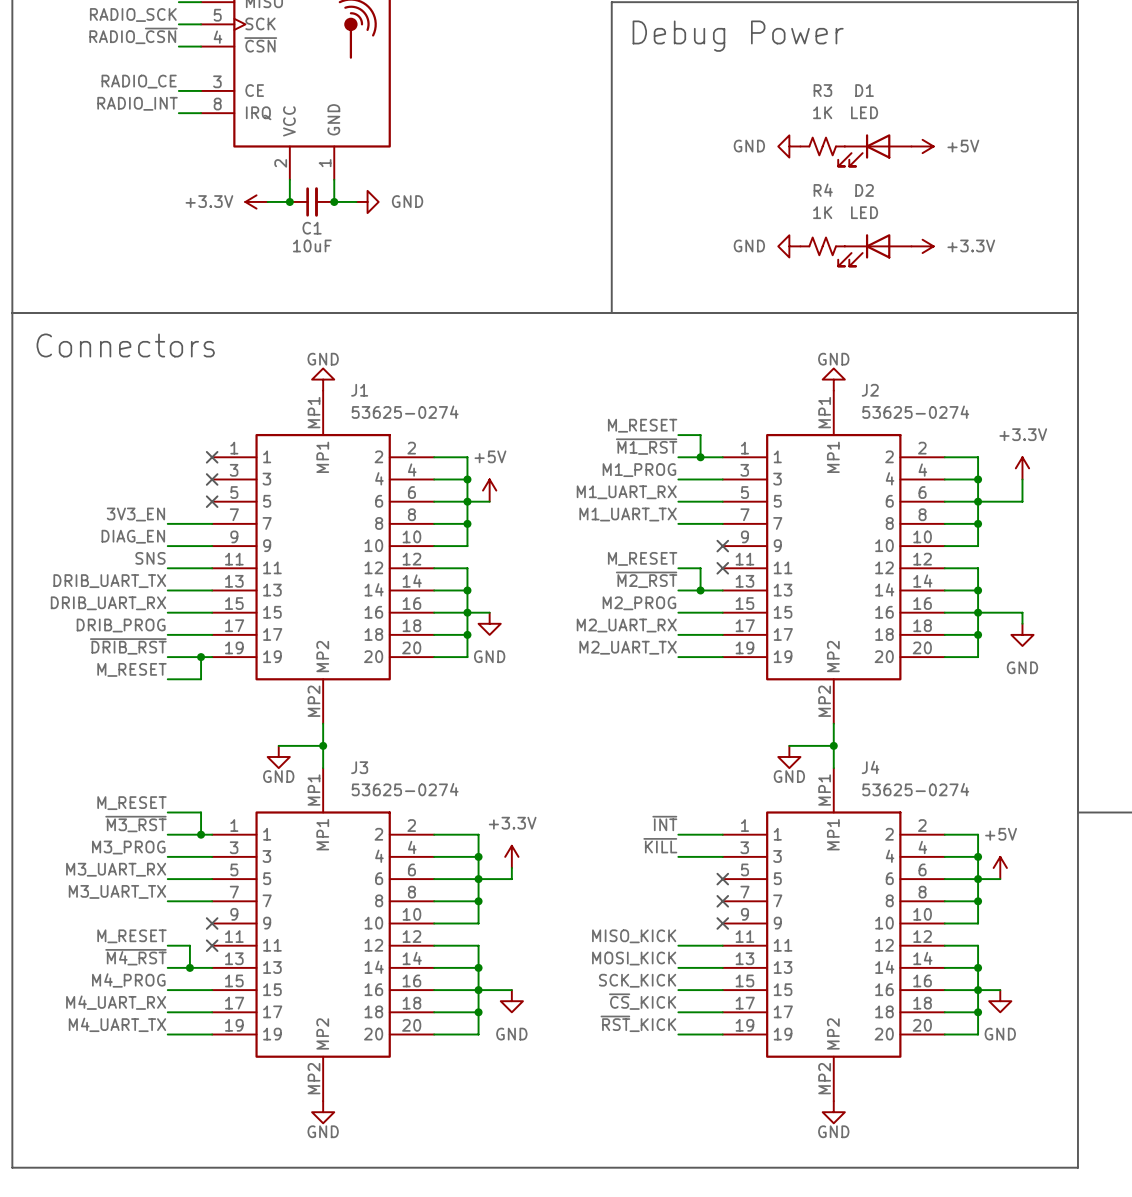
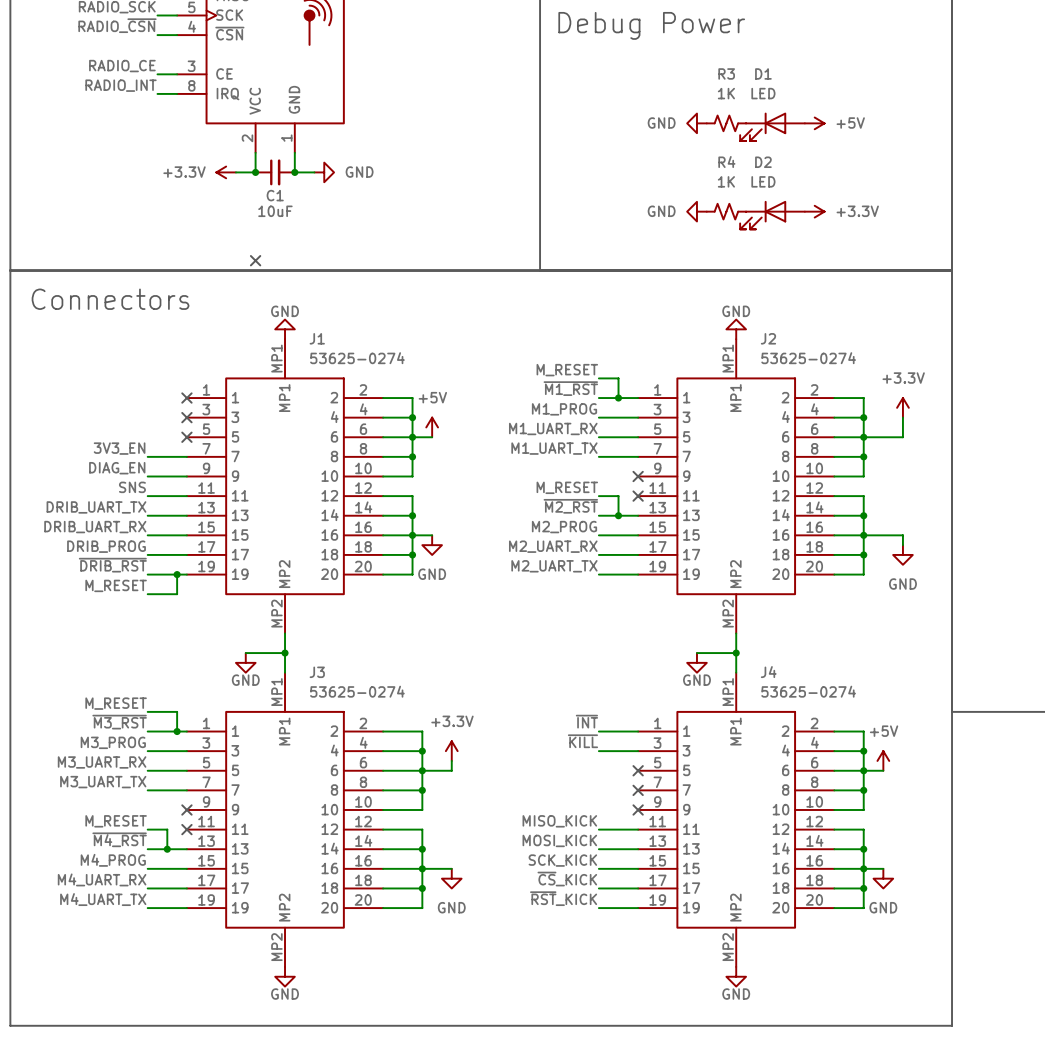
no-connect mark: none -> (255, 260)

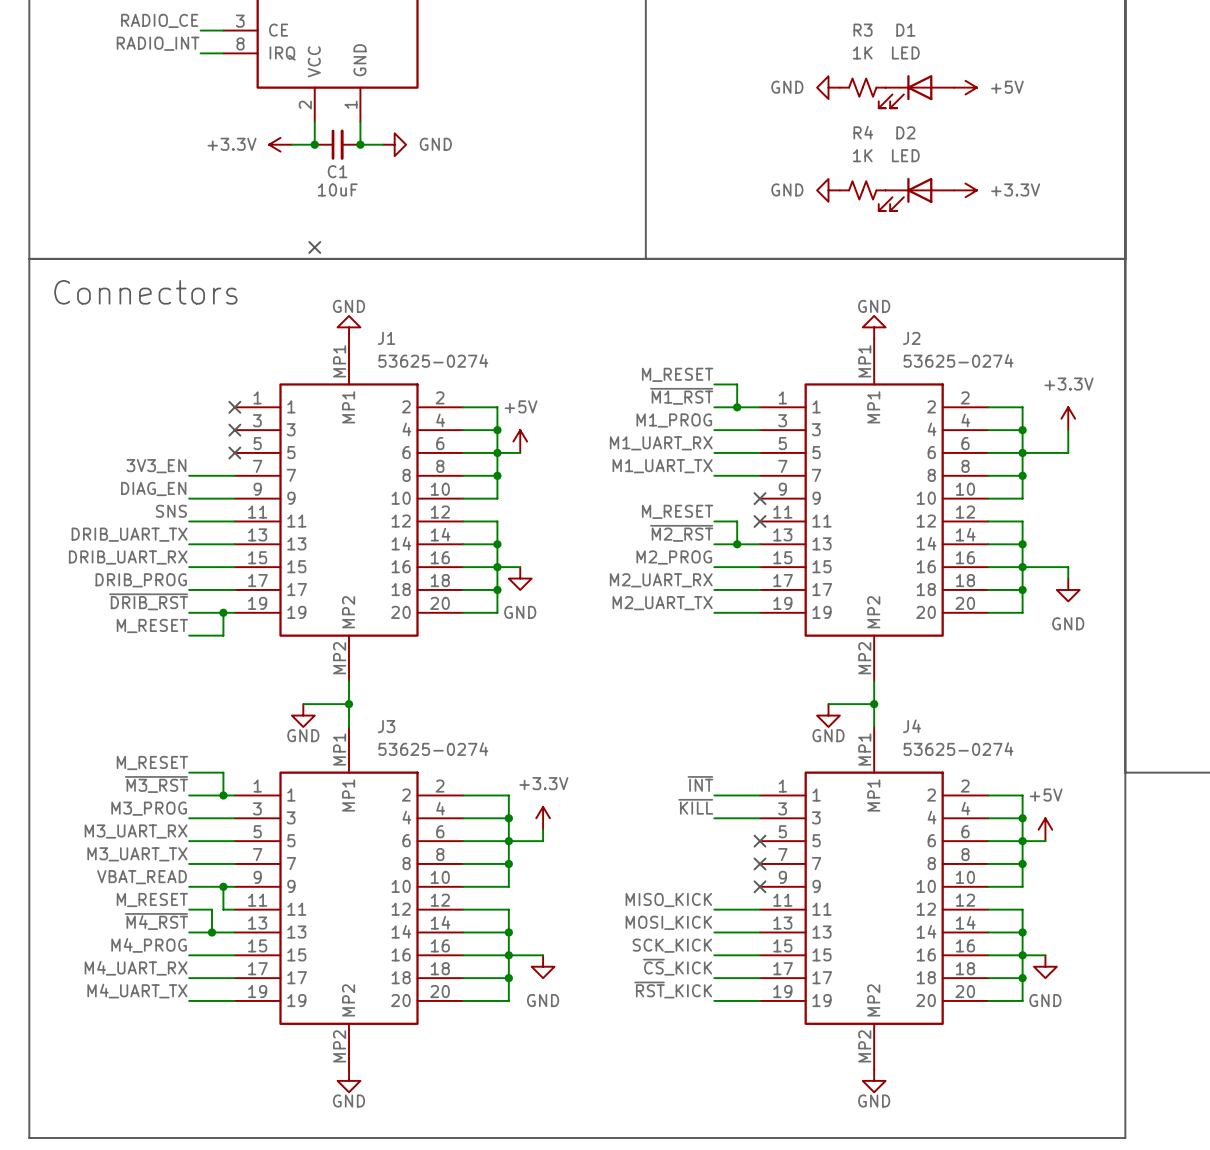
label: none -> VBAT_READ (142, 877)
wire: none -> (189, 886) (234, 886)
wire: none -> (223, 886) (223, 909) (234, 909)
junction: none -> (223, 886)
no-connect mark: (186, 809) -> none
no-connect mark: (186, 829) -> none

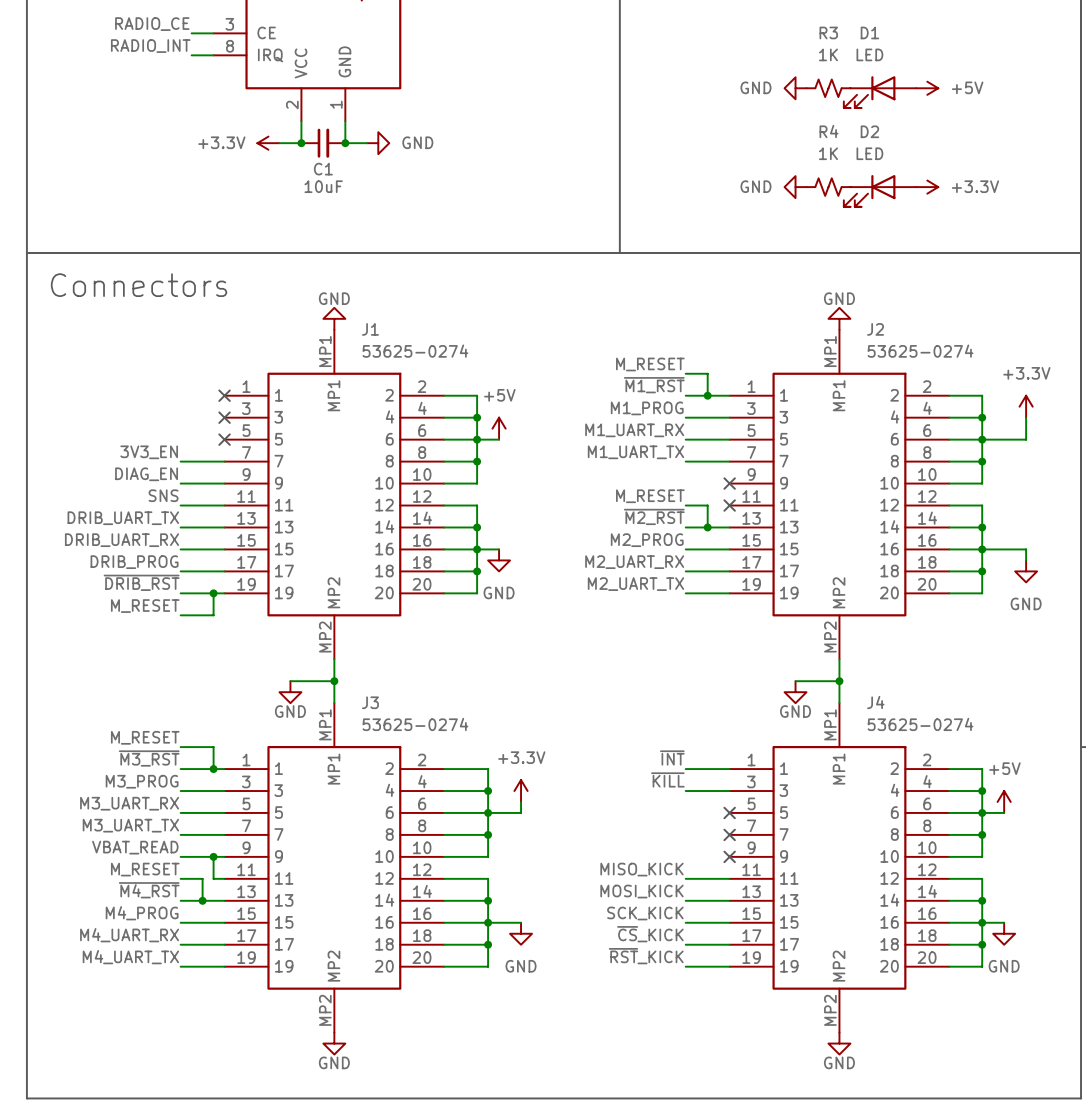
no-connect mark: (314, 247) -> none

